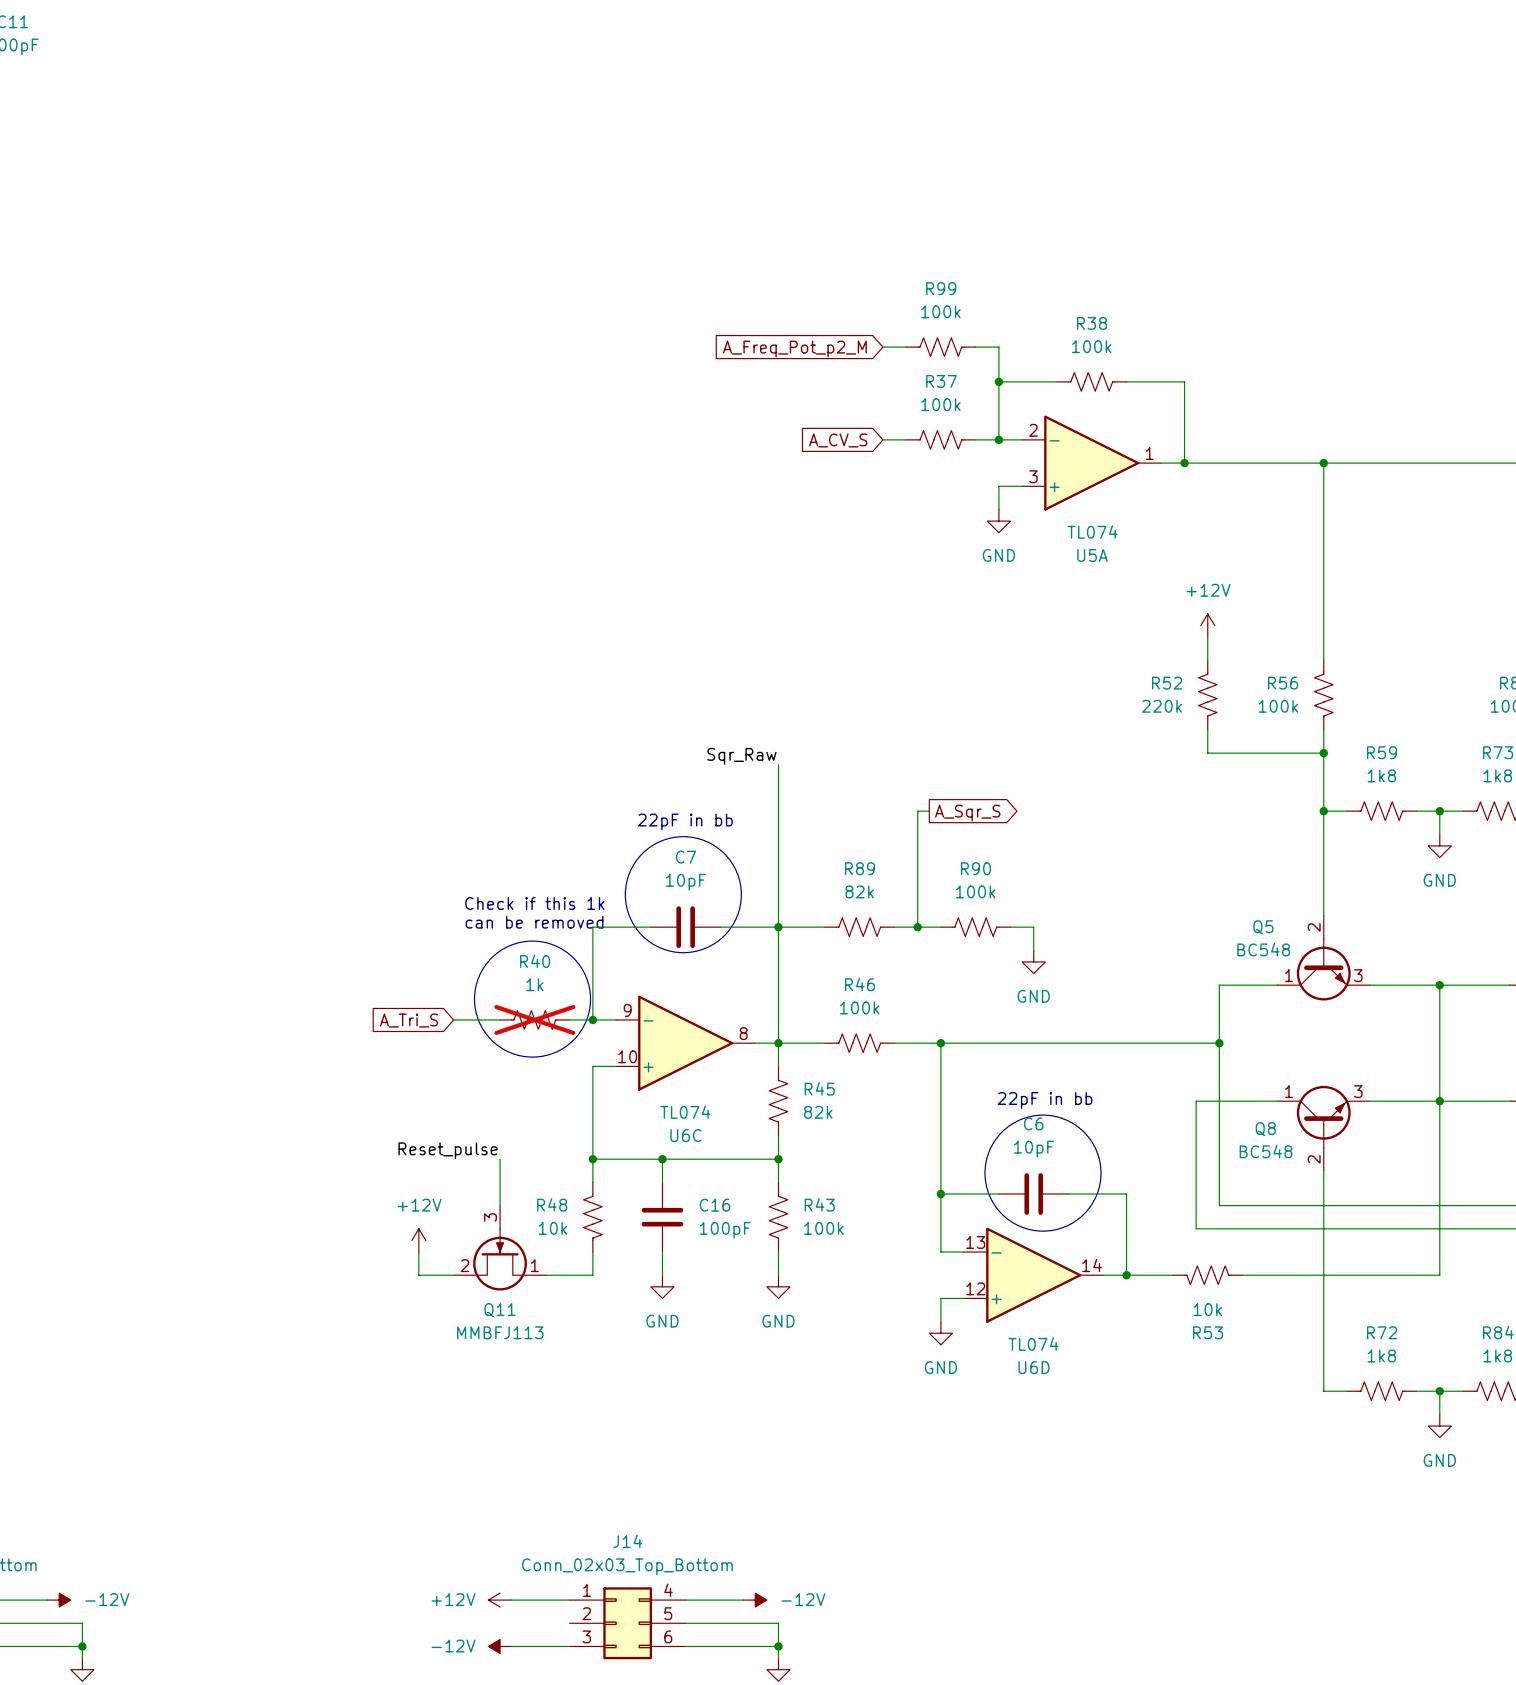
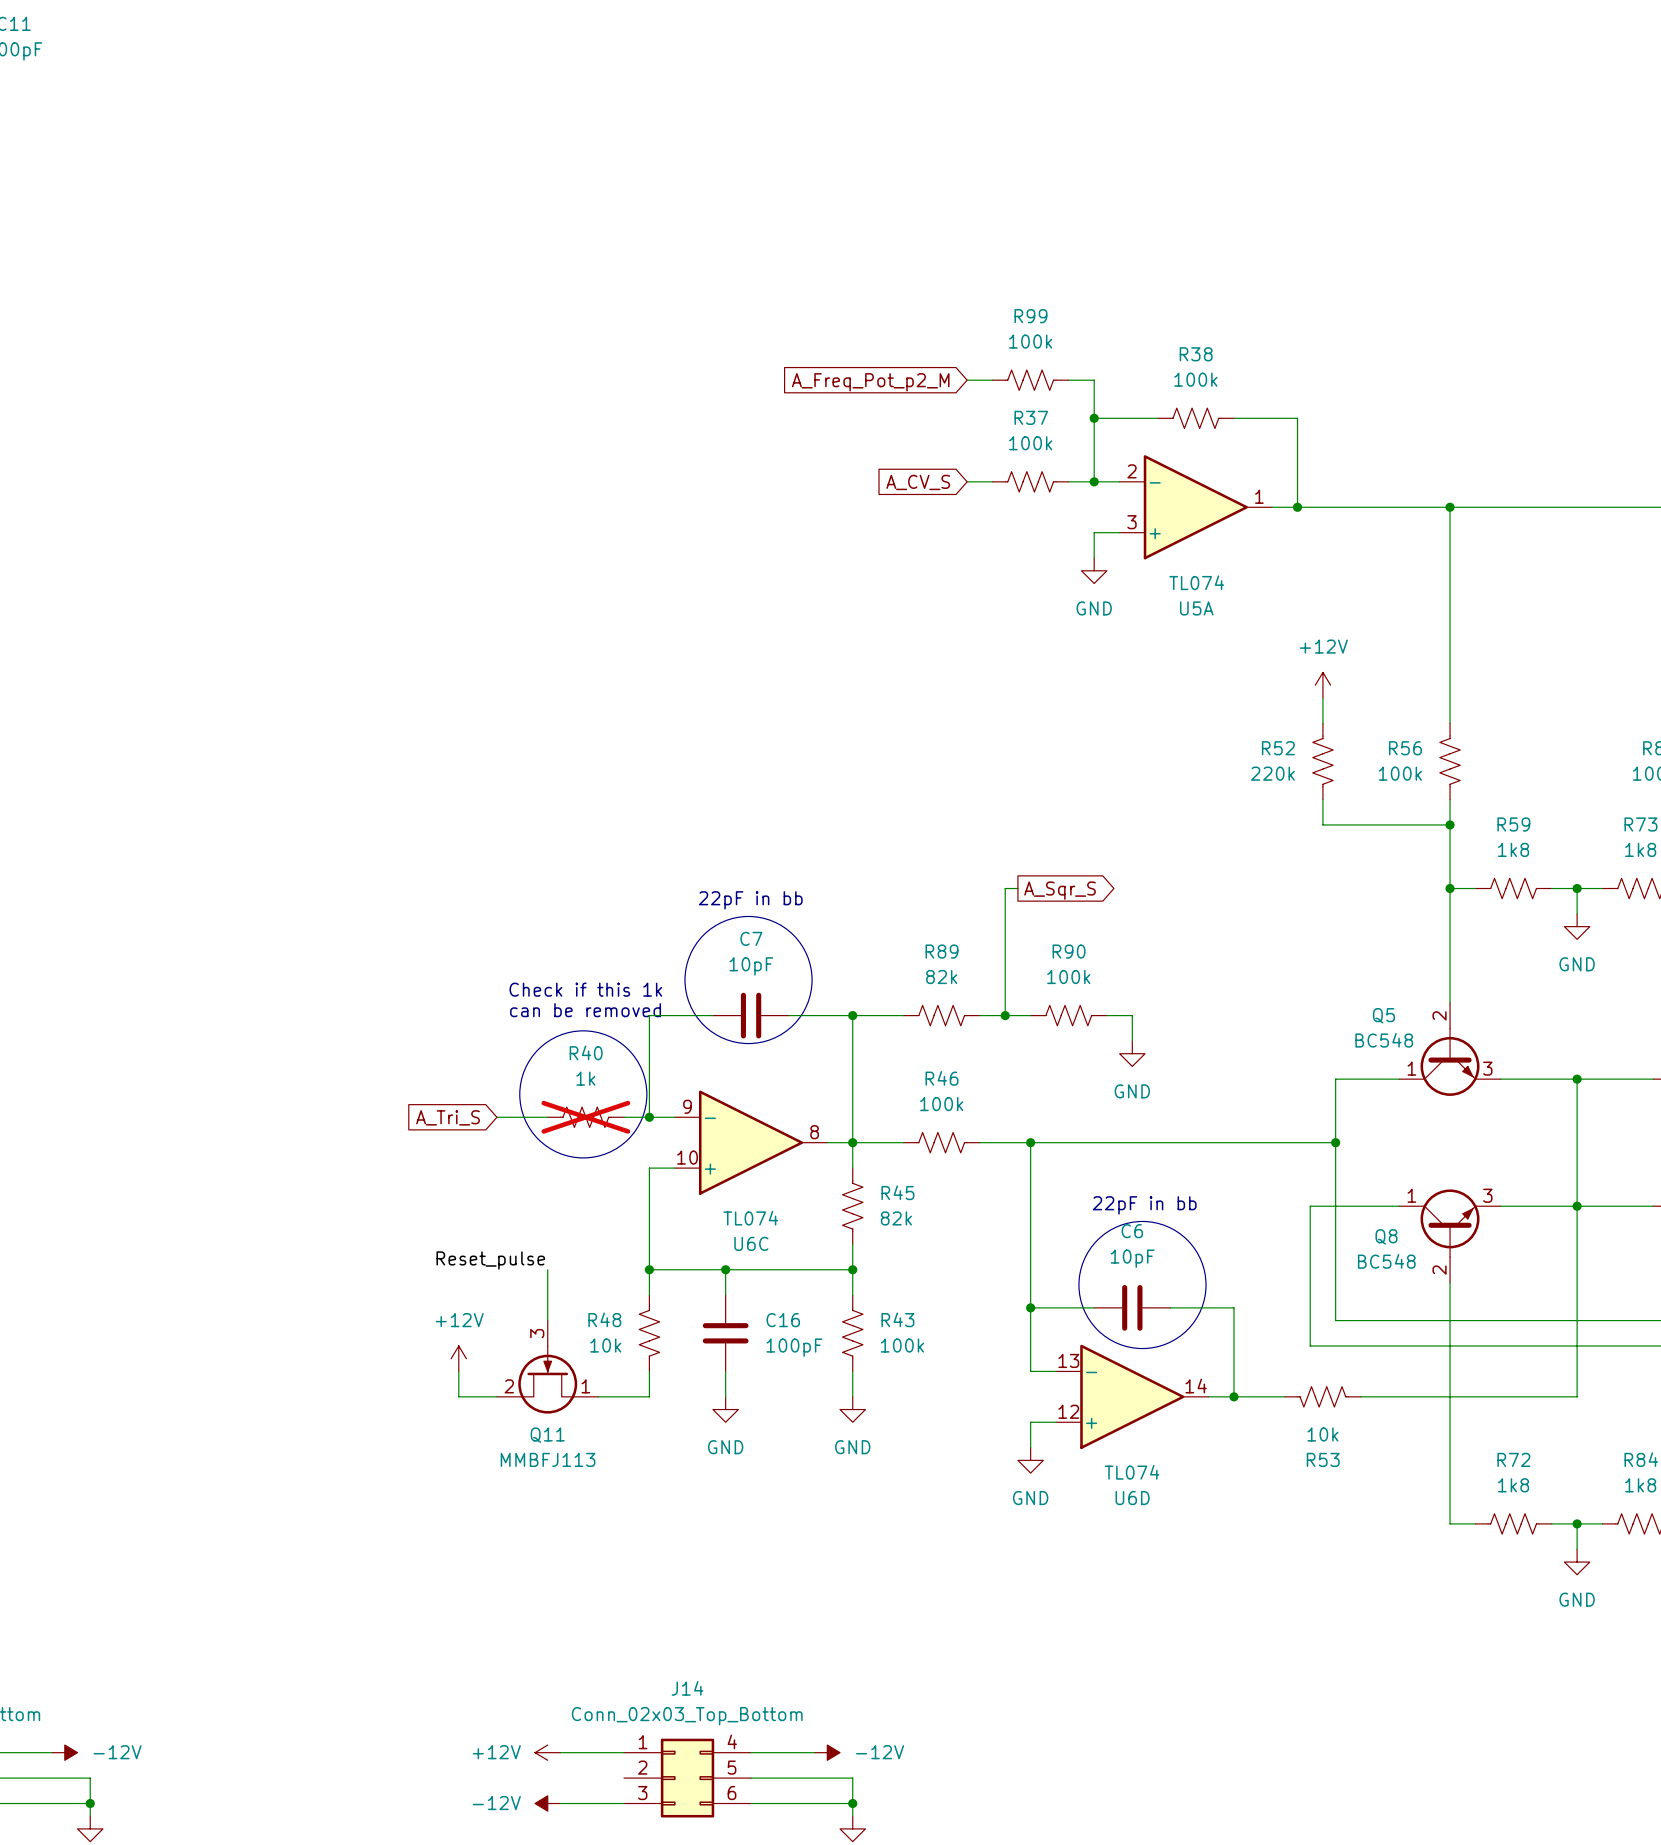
label: Sqr_Raw (741, 756) -> none
wire: (778, 764) (778, 927) -> none

